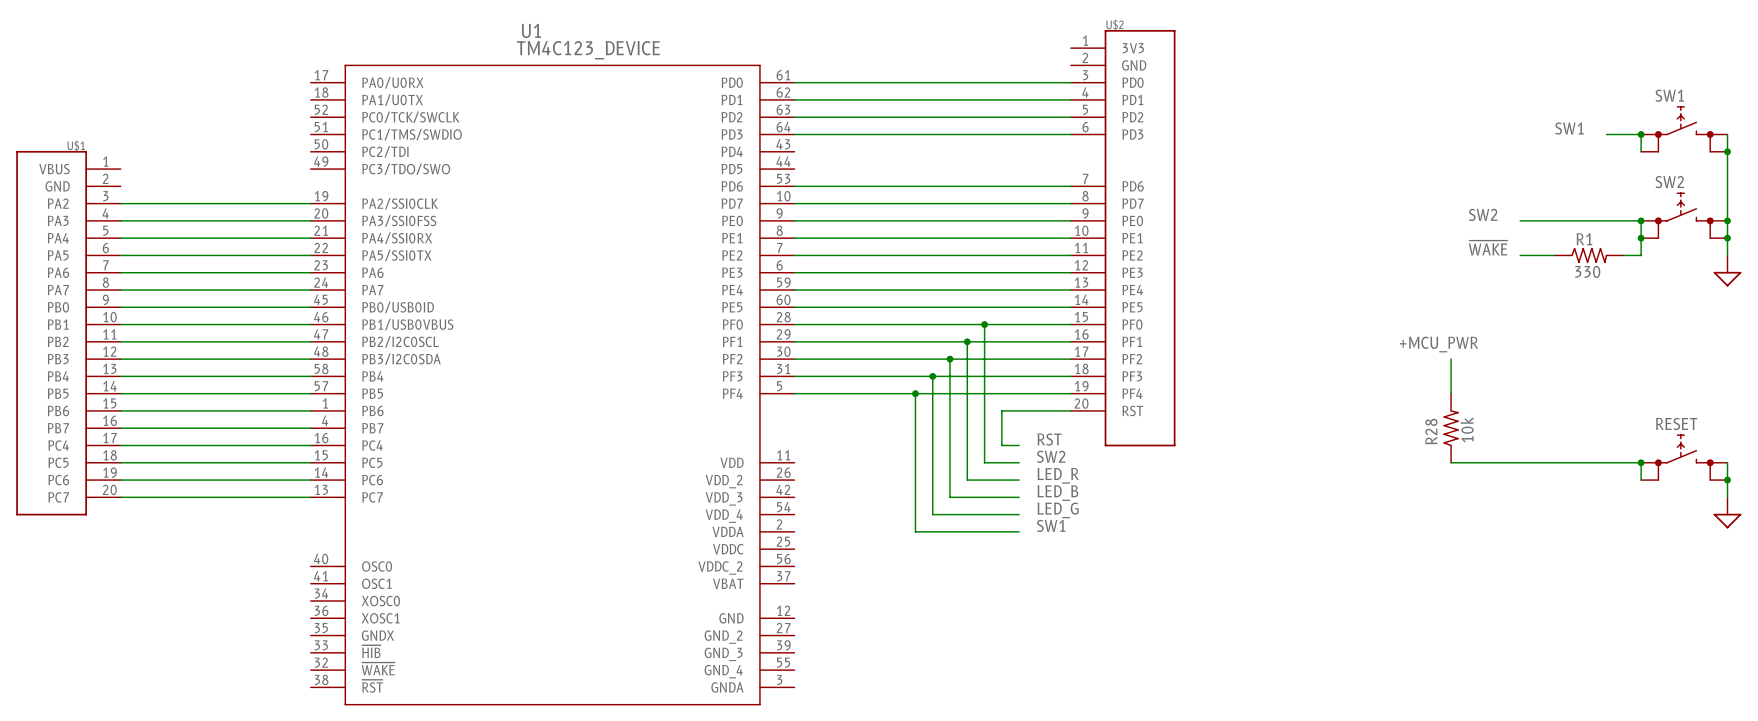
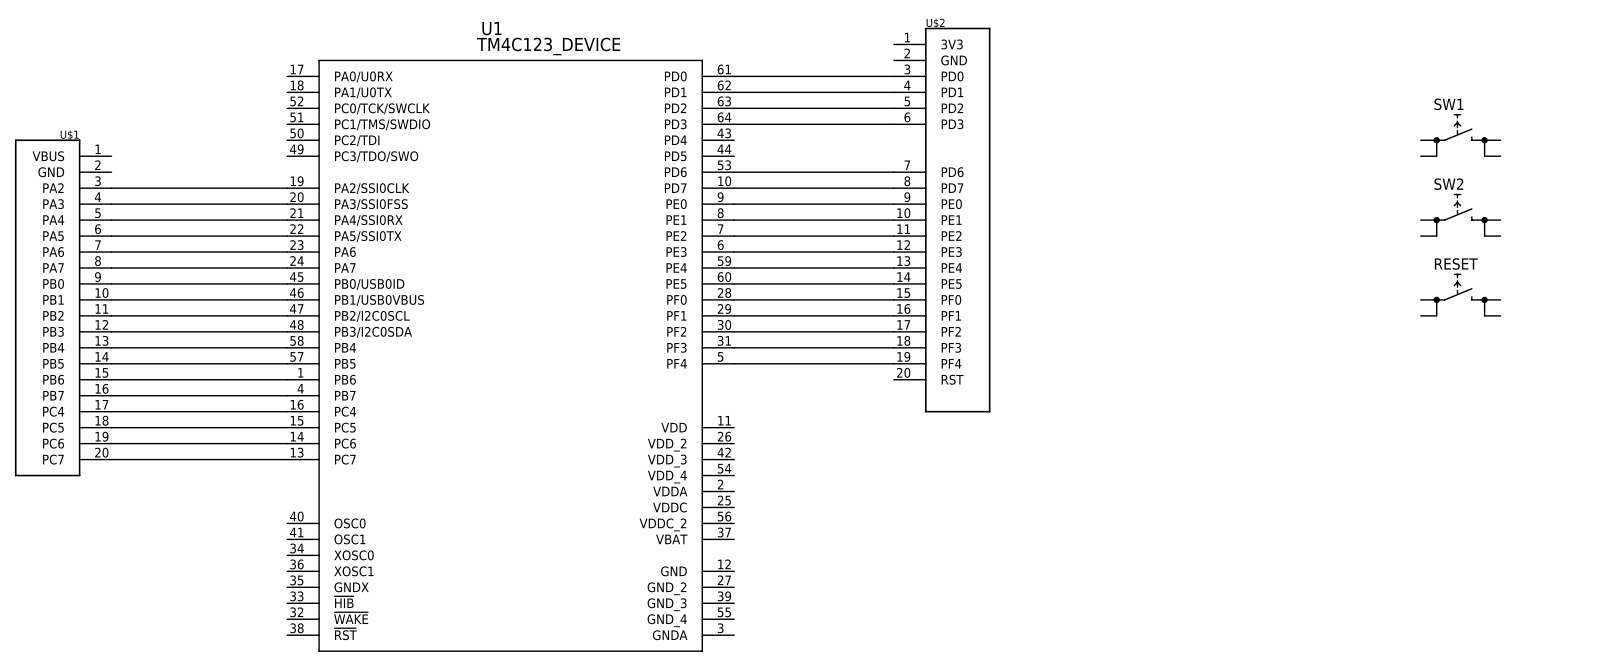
wire: (967, 82) (1070, 82) -> none
wire: (967, 99) (1070, 99) -> none
wire: (967, 117) (1070, 117) -> none
label: SW1 (1569, 128) -> none
SW1 position: (1684, 129) -> (1460, 135)
wire: (967, 134) (1070, 134) -> none
wire: (1606, 134) (1641, 134) (1641, 151) -> none
junction: (1641, 134) -> none
wire: (1727, 134) (1727, 255) -> none
junction: (1727, 151) -> none
wire: (967, 186) (1070, 186) -> none
wire: (967, 203) (1070, 203) -> none
label: SW2 (1483, 214) -> none
SW2 position: (1684, 215) -> (1460, 215)
wire: (967, 220) (1070, 220) -> none
wire: (1520, 220) (1641, 220) (1641, 255) (1623, 255) -> none
junction: (1641, 220) -> none
junction: (1727, 220) -> none
wire: (967, 238) (1070, 238) -> none
U$2 position: (1123, 238) -> (942, 220)
junction: (1641, 238) -> none
junction: (1727, 238) -> none
label: ~{WAKE} (1488, 248) -> none
wire: (967, 255) (1070, 255) -> none
wire: (1520, 255) (1554, 255) -> none
R1: 330 (1589, 255) -> none
power symbol: (1727, 270) -> none
wire: (967, 272) (1070, 272) -> none
wire: (967, 290) (1070, 290) -> none
wire: (967, 307) (1070, 307) -> none
RESET: none -> (1460, 295)
wire: (967, 324) (1070, 324) -> none
wire: (984, 324) (984, 462) (1019, 462) -> none
junction: (984, 324) -> none
junction: (967, 341) -> none
wire: (1070, 341) (967, 341) (967, 480) (1019, 480) -> none
label: +MCU_PWR (1439, 344) -> none
wire: (950, 359) (950, 497) (1019, 497) -> none
junction: (950, 359) -> none
wire: (967, 359) (1070, 359) -> none
wire: (1451, 359) (1451, 393) -> none
wire: (932, 376) (932, 514) (1019, 514) -> none
junction: (932, 376) -> none
wire: (967, 376) (1070, 376) -> none
wire: (915, 393) (915, 531) (1019, 531) -> none
junction: (915, 393) -> none
wire: (967, 393) (1070, 393) -> none
wire: (1070, 410) (1001, 410) (1001, 445) (1019, 445) -> none
R28: 10k (1451, 428) -> none
label: RST (1049, 439) -> none
label: SW2 (1051, 456) -> none
RESET: (1684, 457) -> none
wire: (1451, 462) (1641, 462) (1641, 480) -> none
junction: (1641, 462) -> none
wire: (1727, 462) (1727, 497) -> none
label: LED_R (1058, 475) -> none
junction: (1727, 480) -> none
label: LED_B (1057, 493) -> none
label: LED_G (1058, 510) -> none
power symbol: (1727, 512) -> none
label: SW1 (1051, 525) -> none

